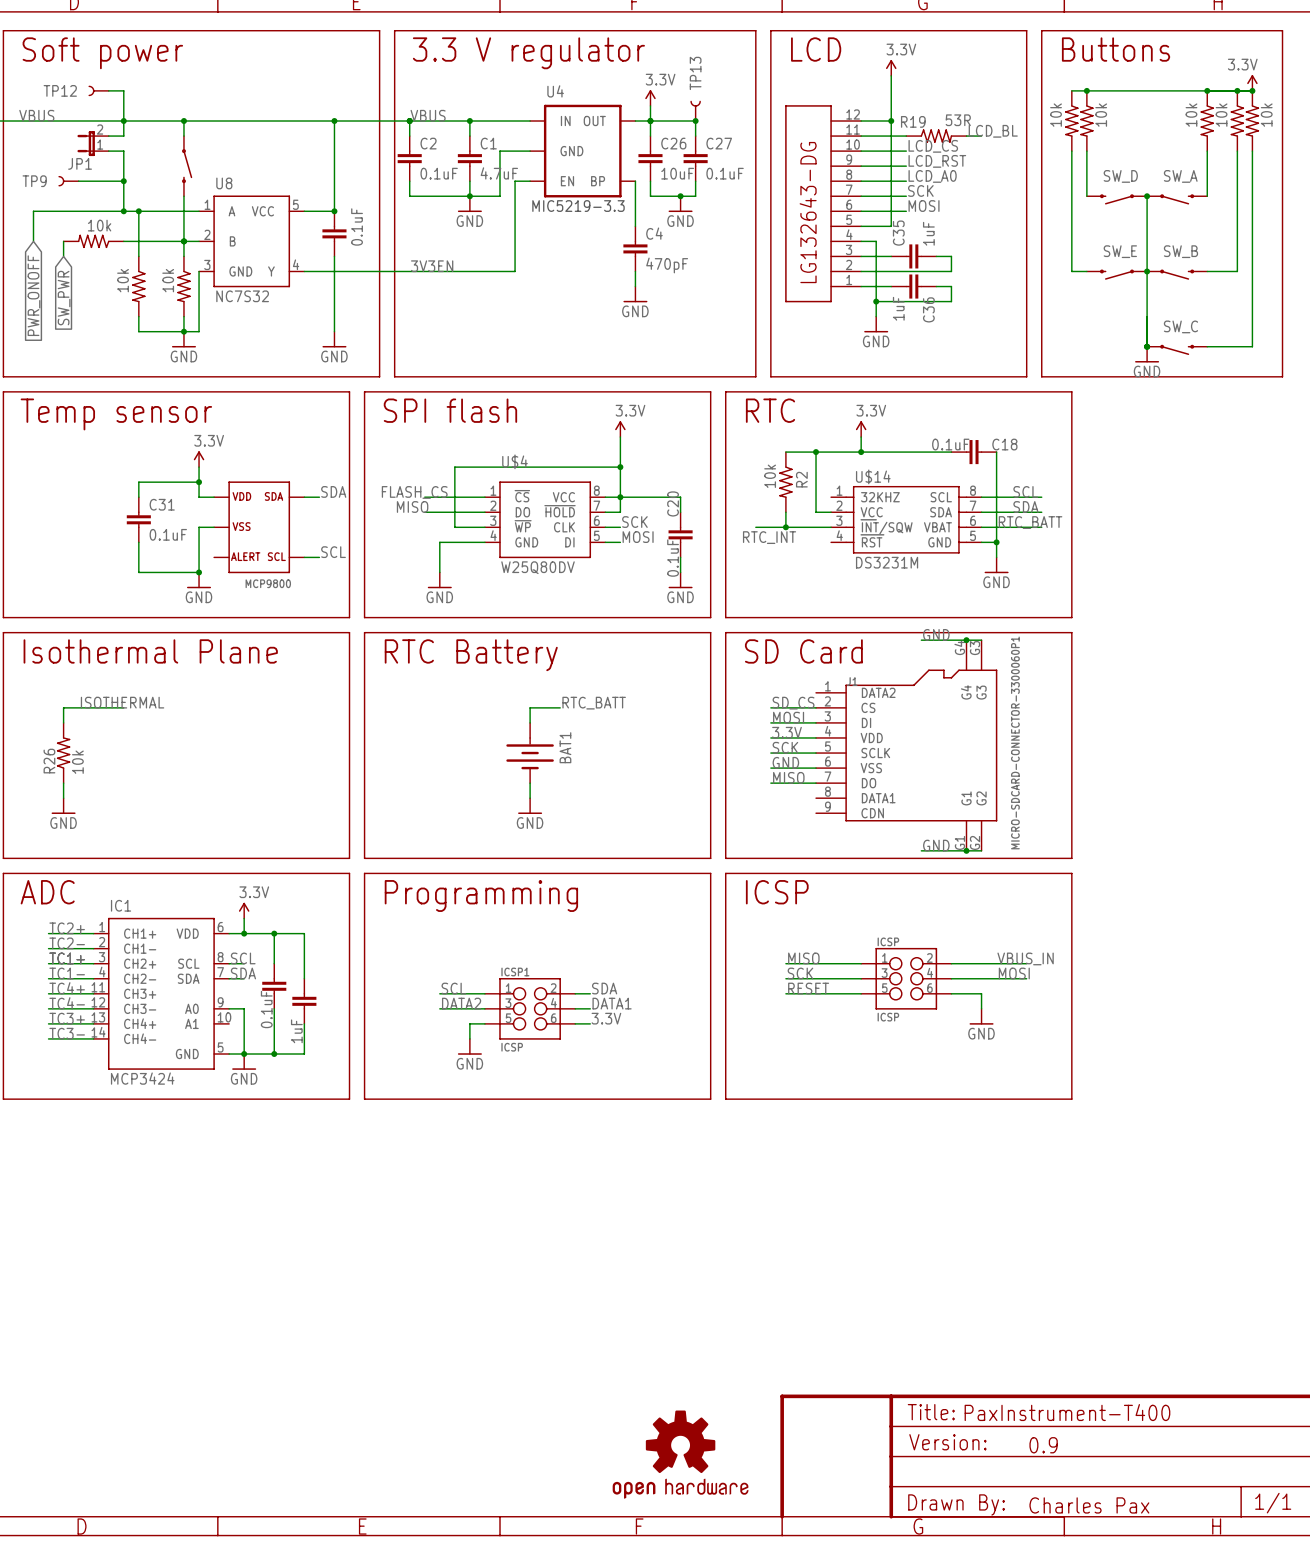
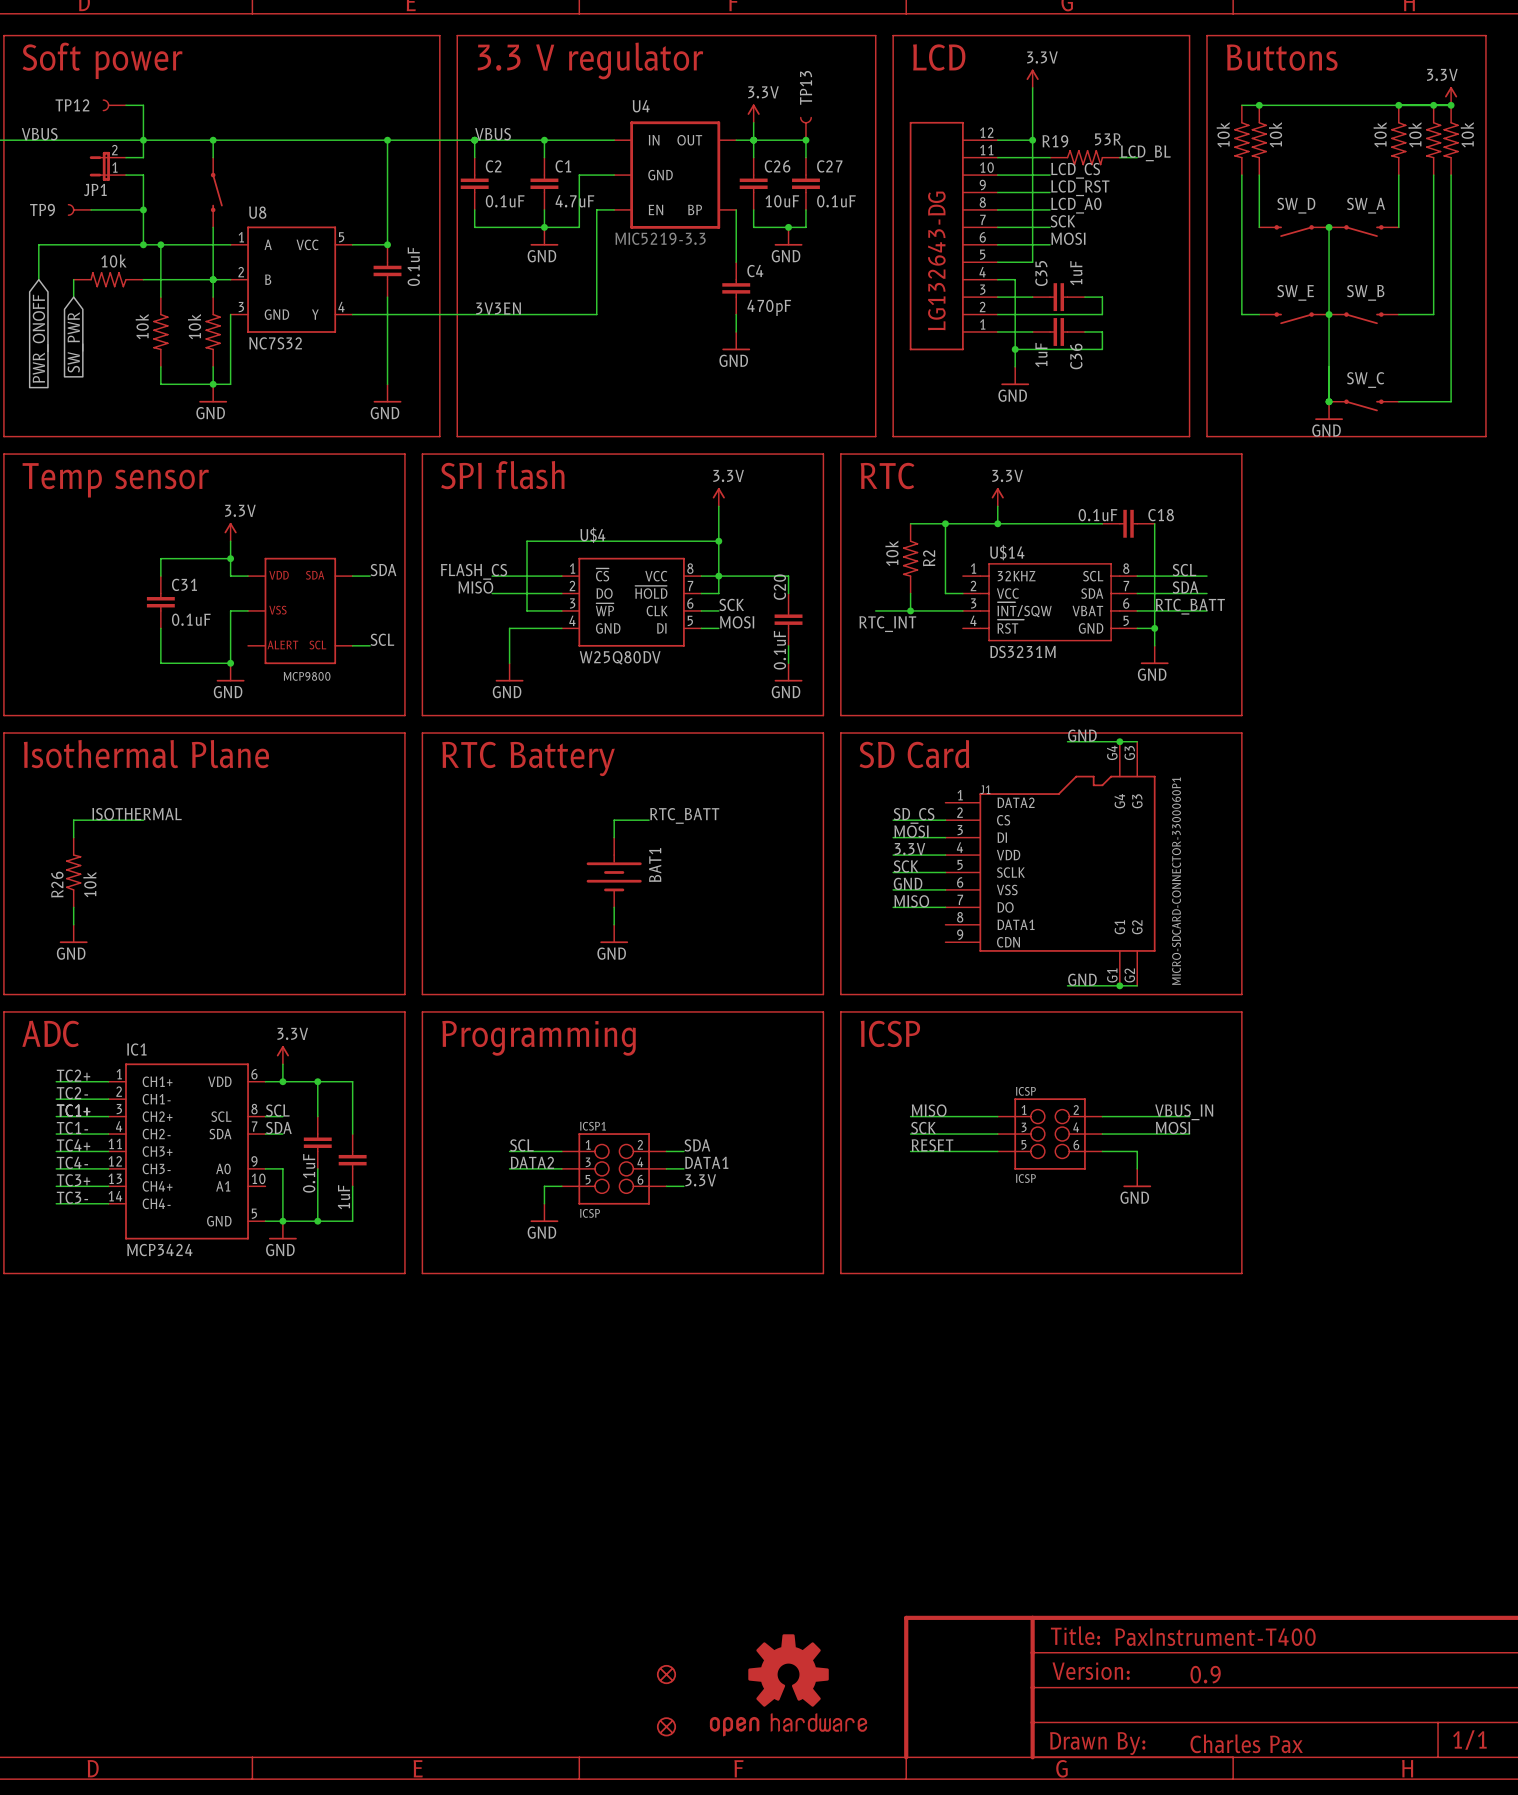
part: none -> (666, 1674)
part: none -> (666, 1726)

